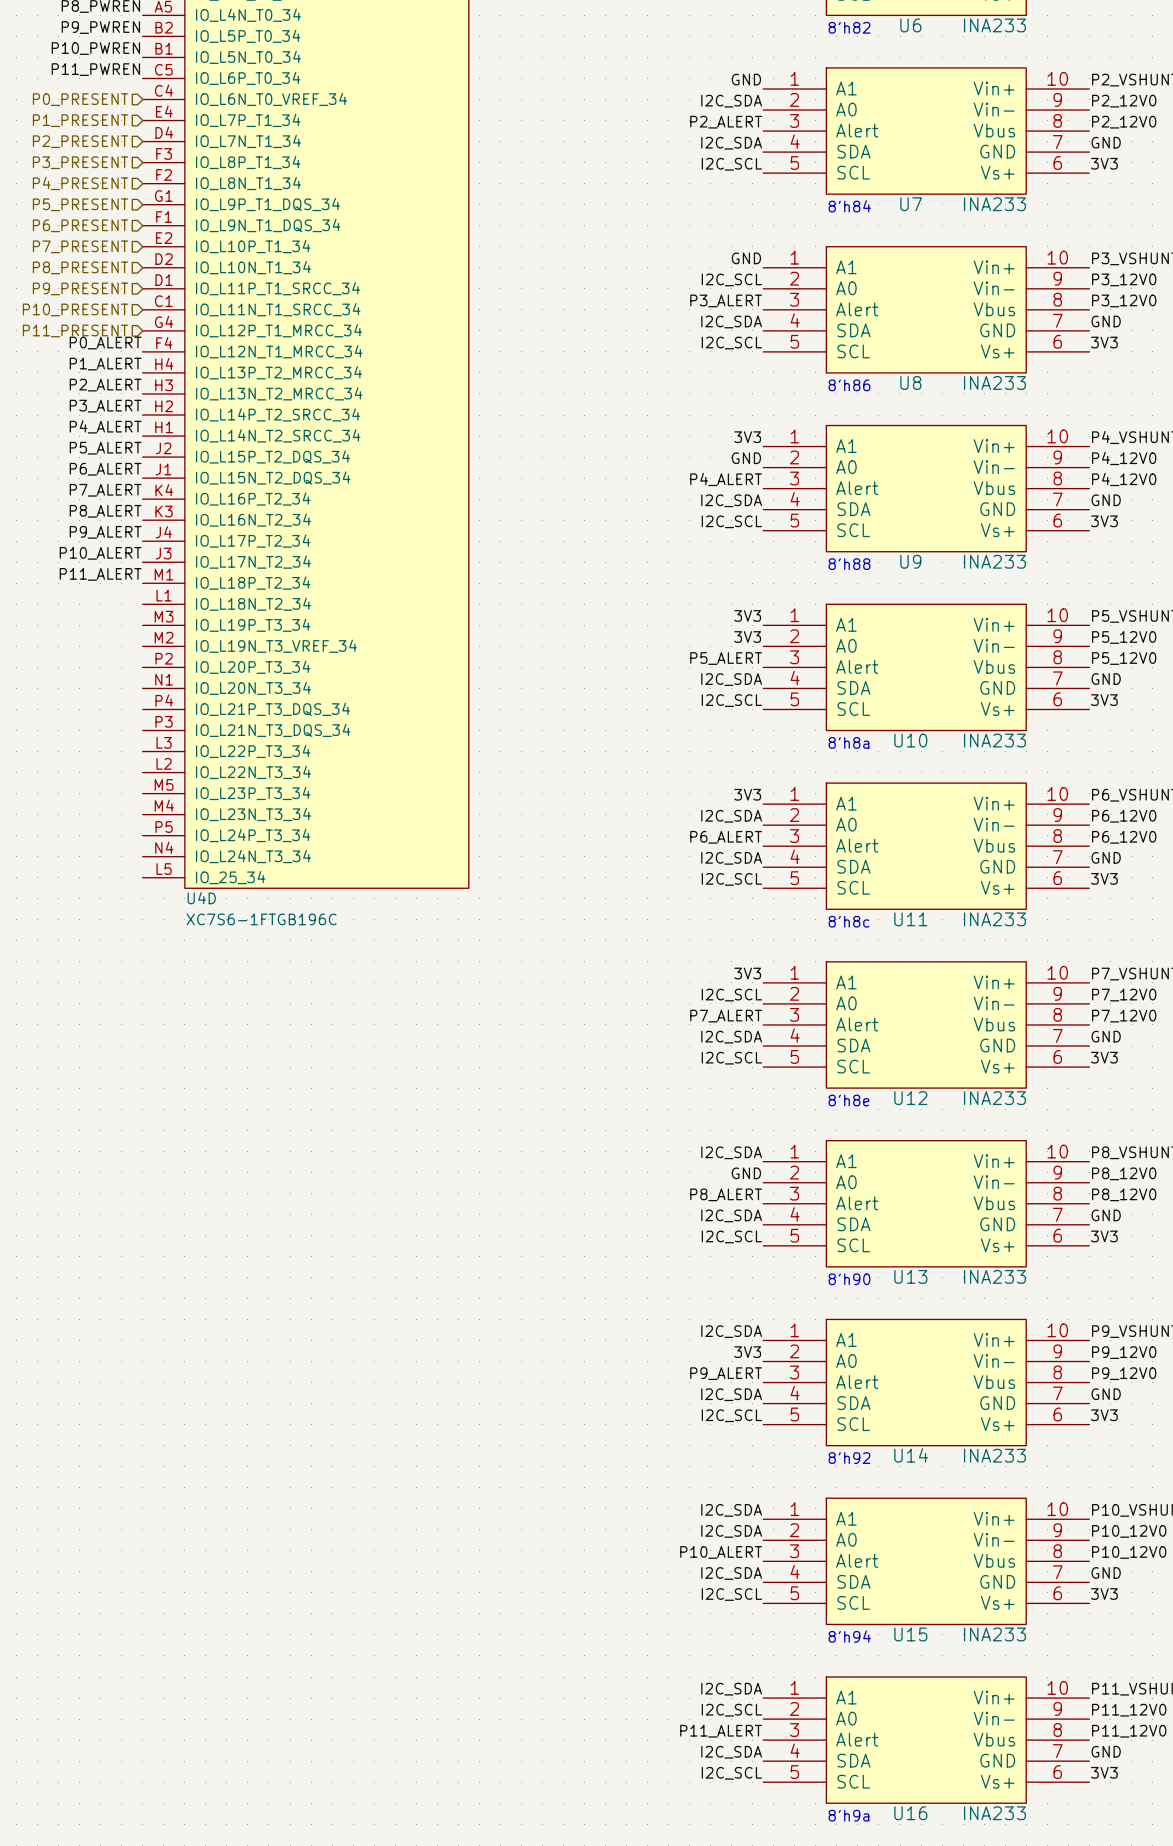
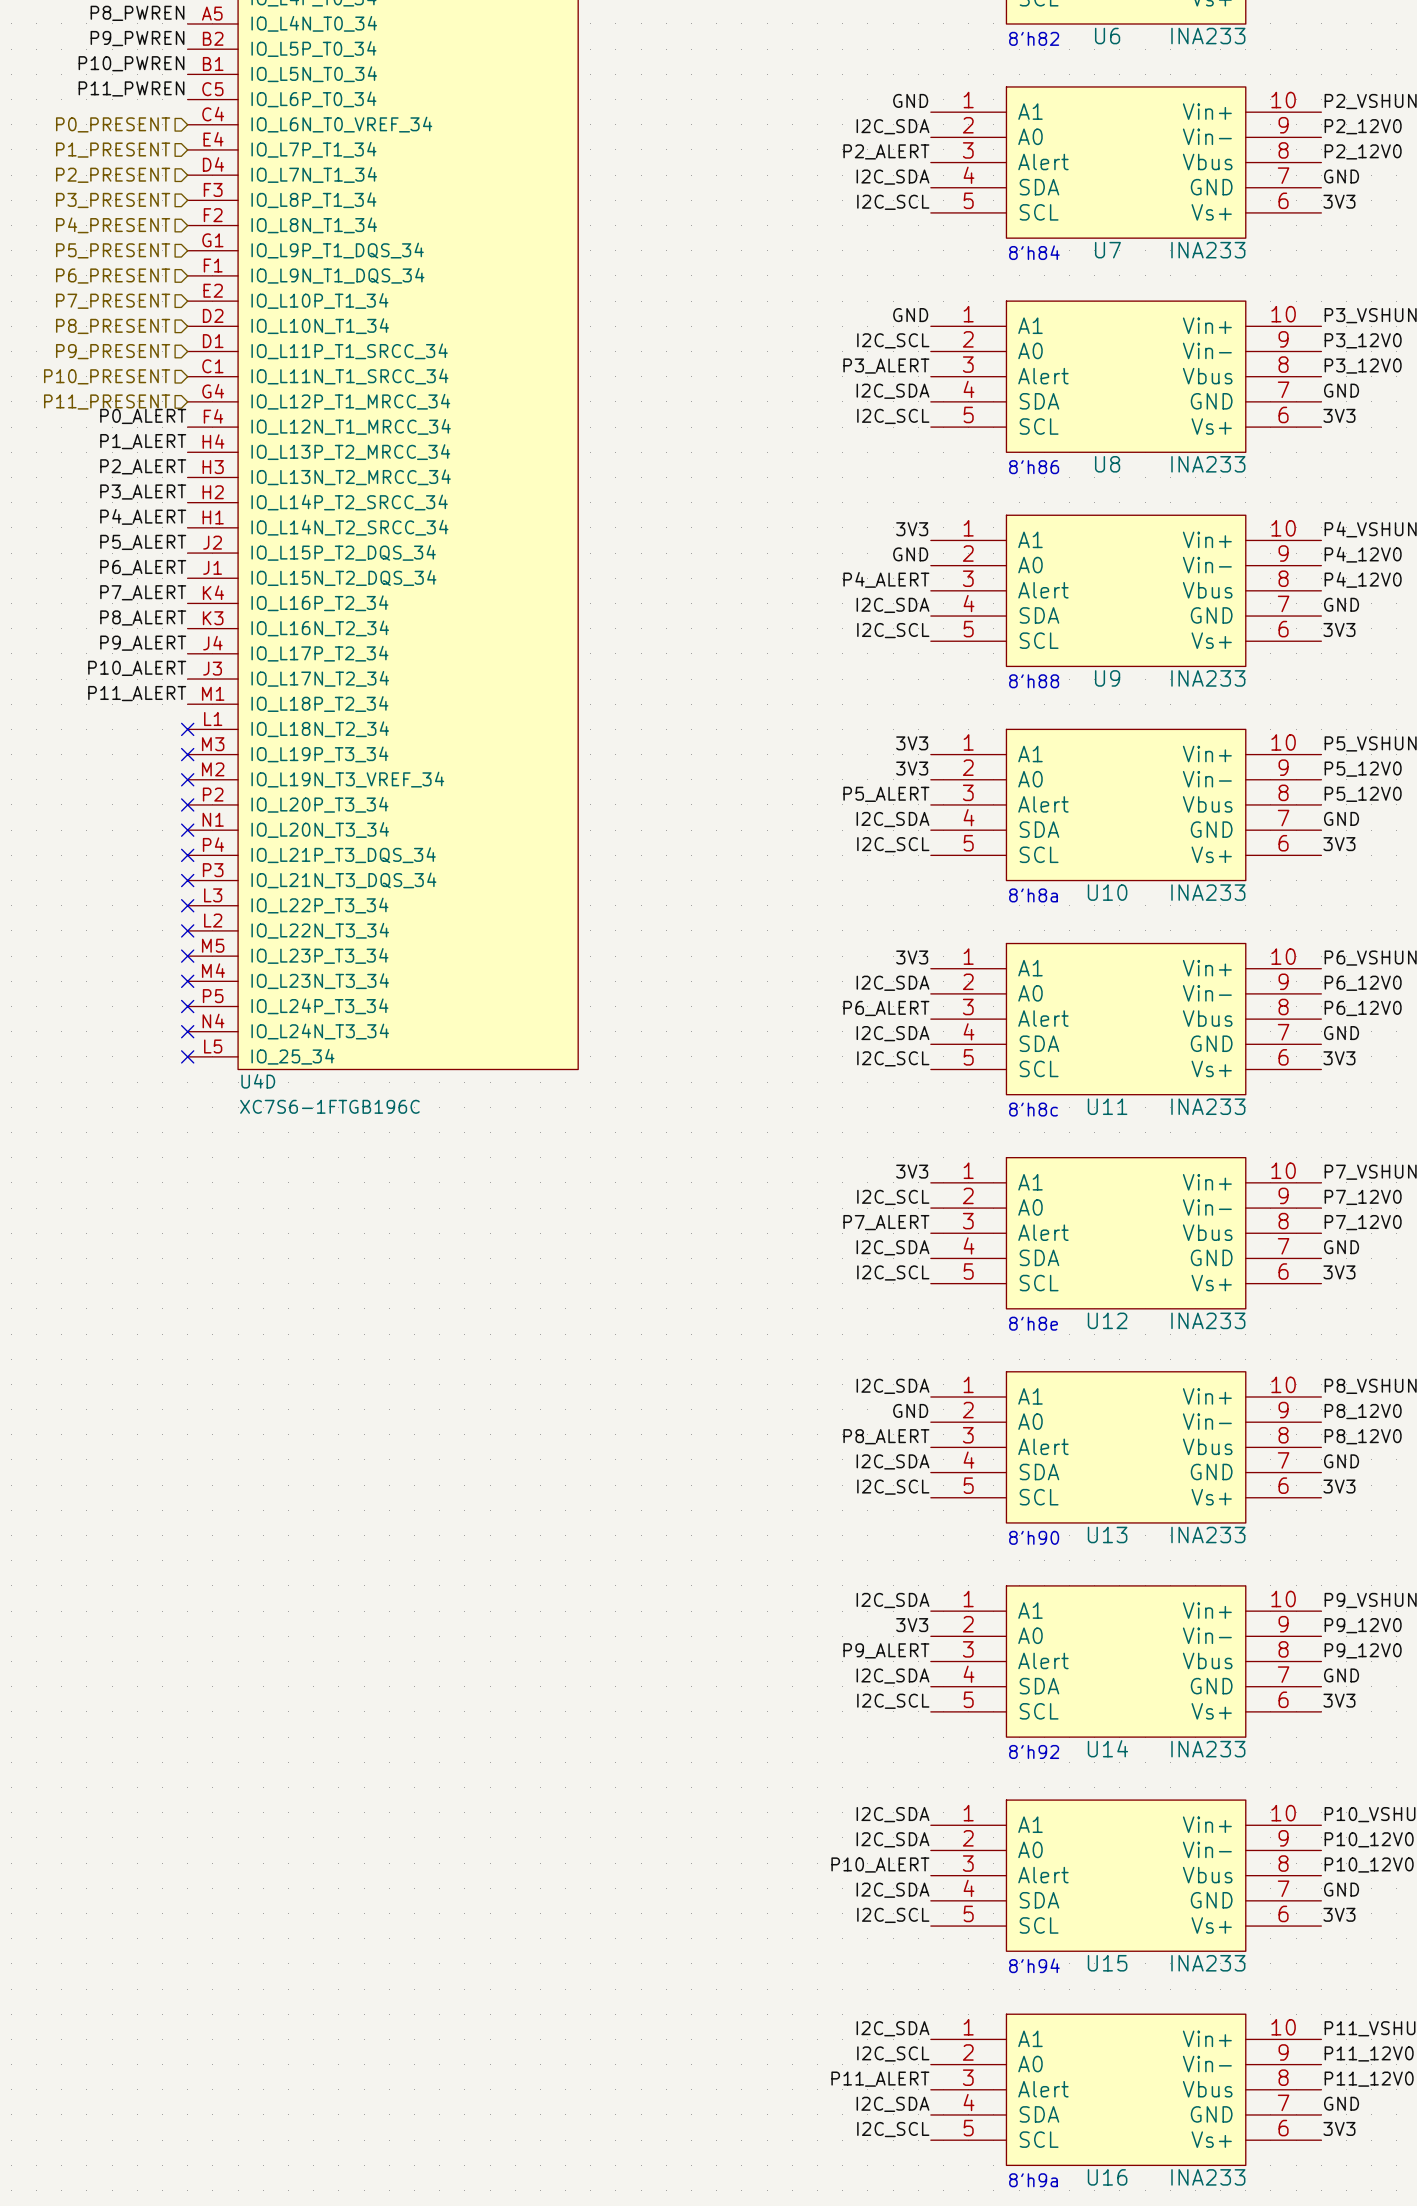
no-connect mark: none -> (187, 729)
no-connect mark: none -> (187, 754)
no-connect mark: none -> (187, 779)
no-connect mark: none -> (187, 804)
no-connect mark: none -> (187, 830)
no-connect mark: none -> (187, 855)
no-connect mark: none -> (187, 880)
no-connect mark: none -> (187, 905)
no-connect mark: none -> (187, 930)
no-connect mark: none -> (187, 956)
no-connect mark: none -> (187, 981)
no-connect mark: none -> (187, 1006)
no-connect mark: none -> (187, 1031)
no-connect mark: none -> (187, 1056)

